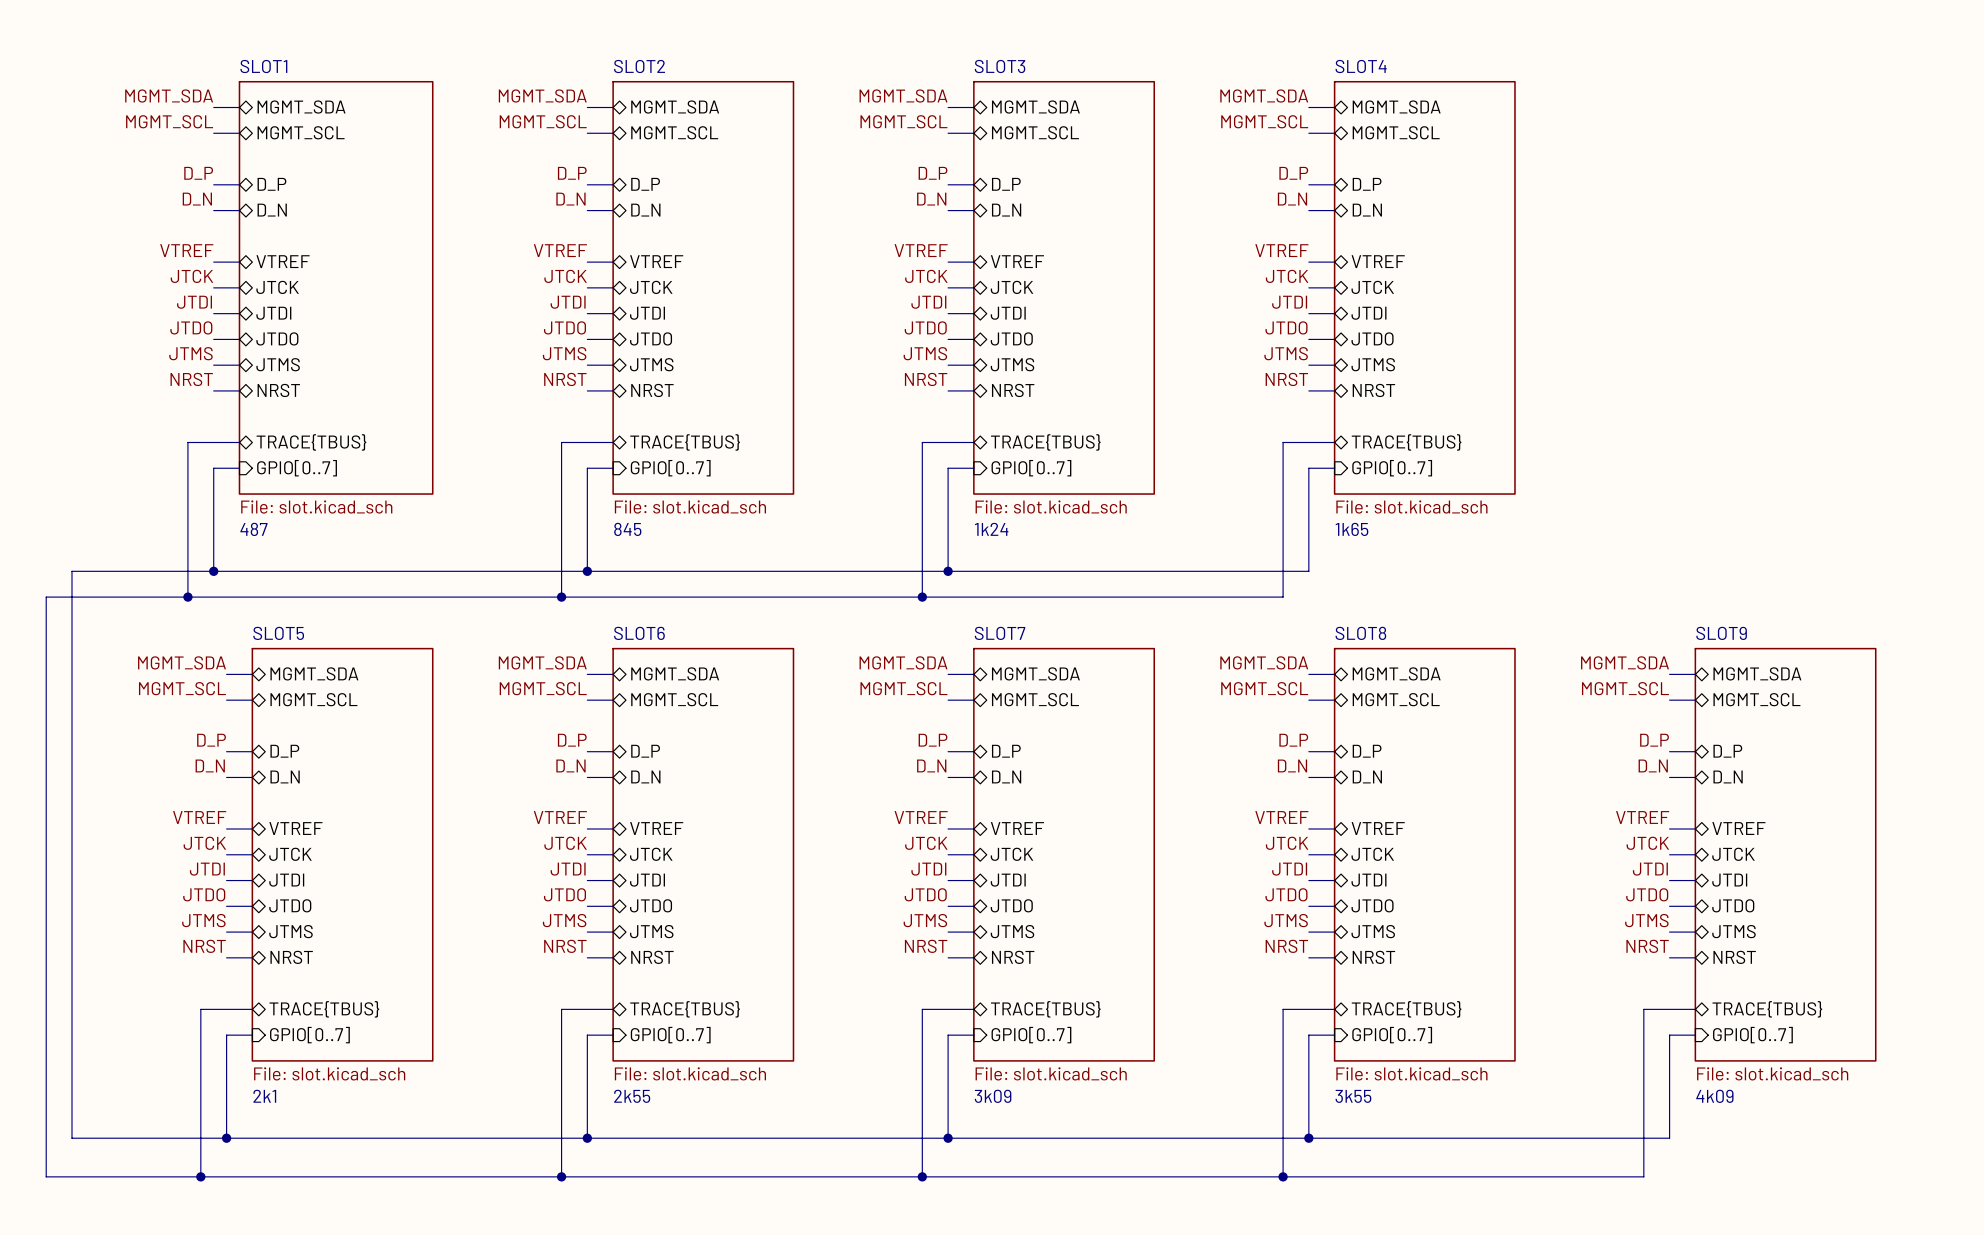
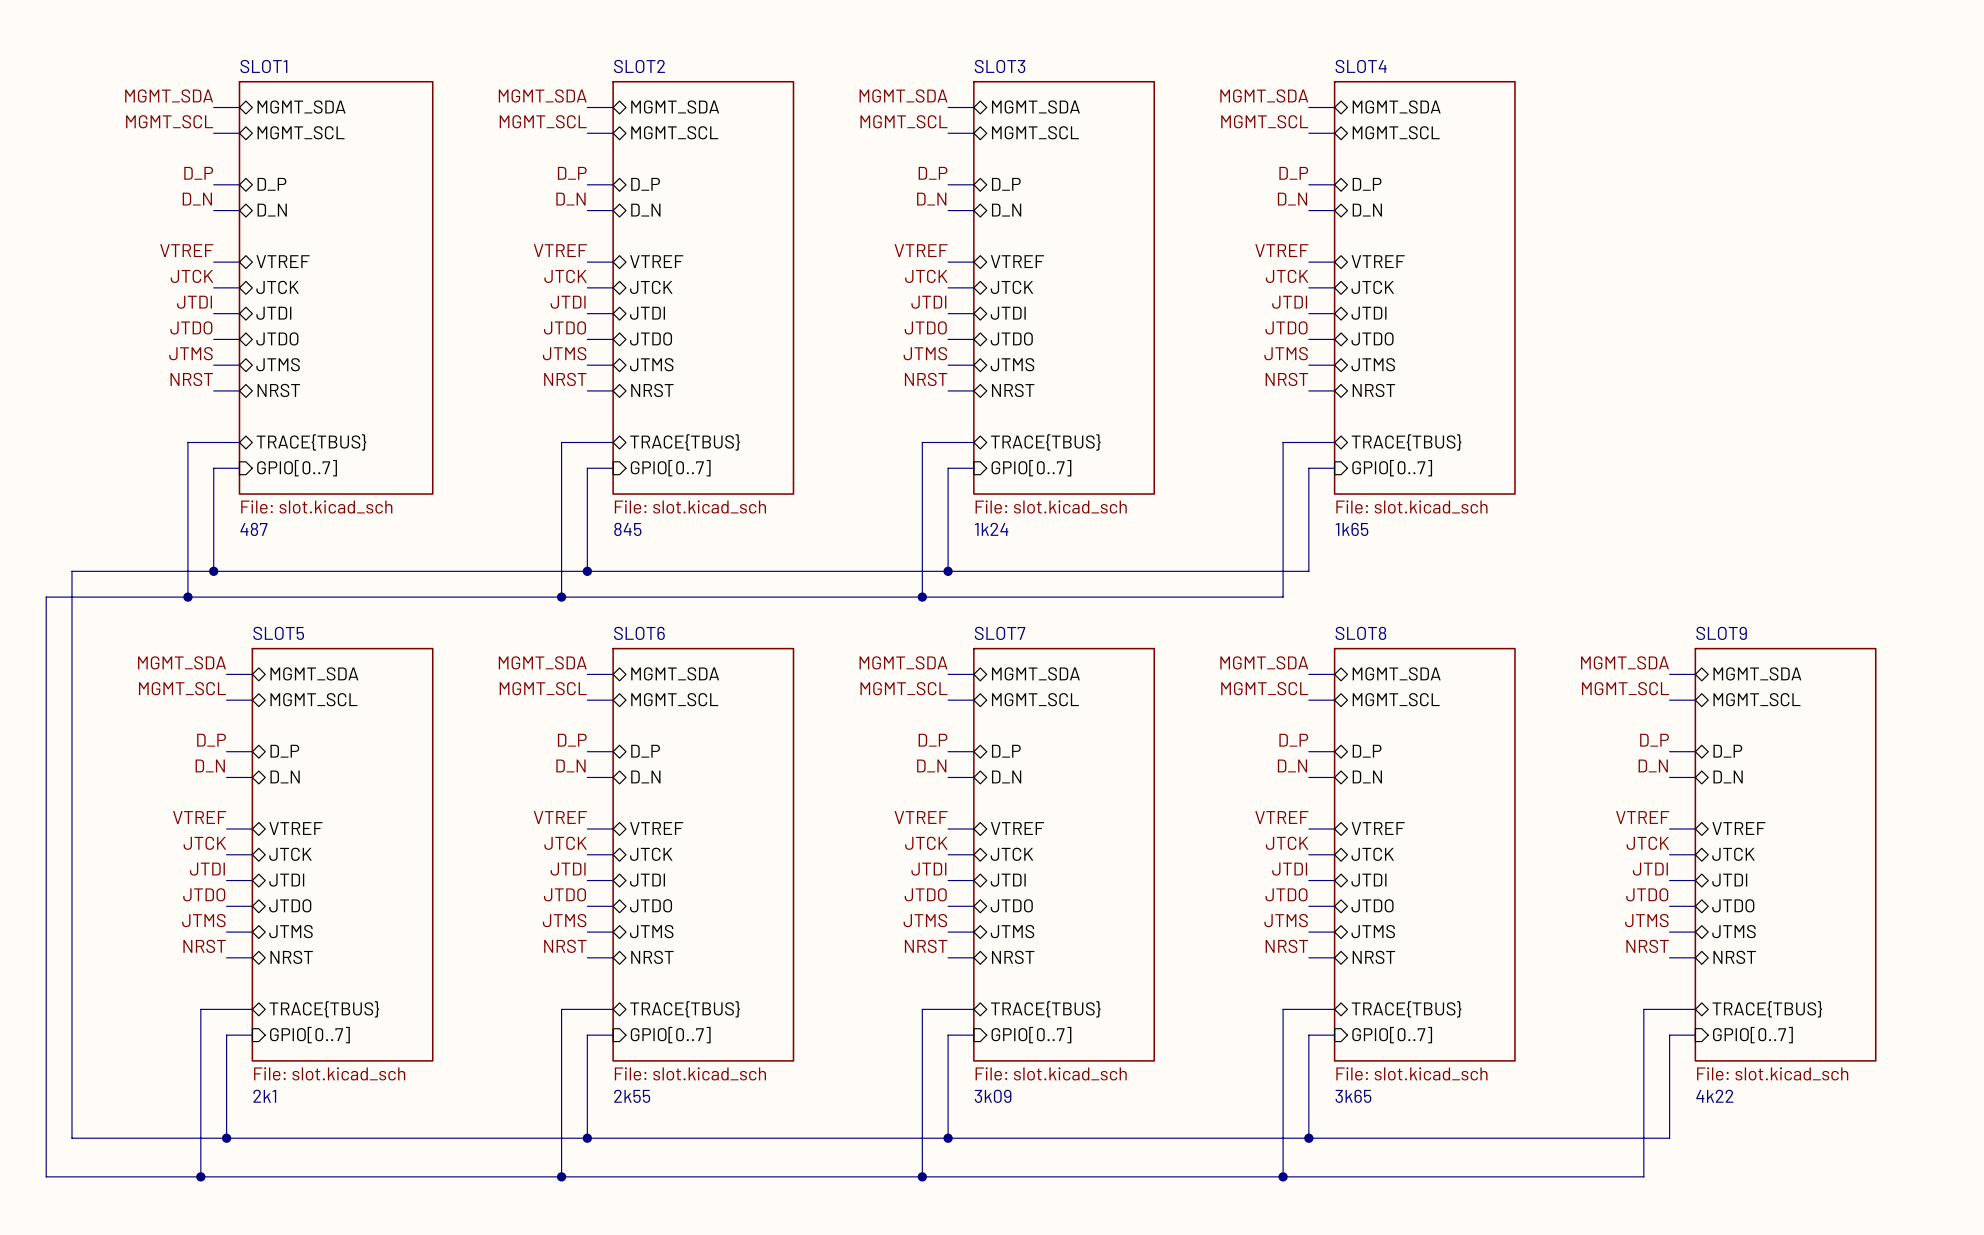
sheet SLOT8 text: 3k55 (1353, 1096) -> 3k65 (1353, 1096)
sheet SLOT9 text: 4k09 (1714, 1096) -> 4k22 (1714, 1096)

